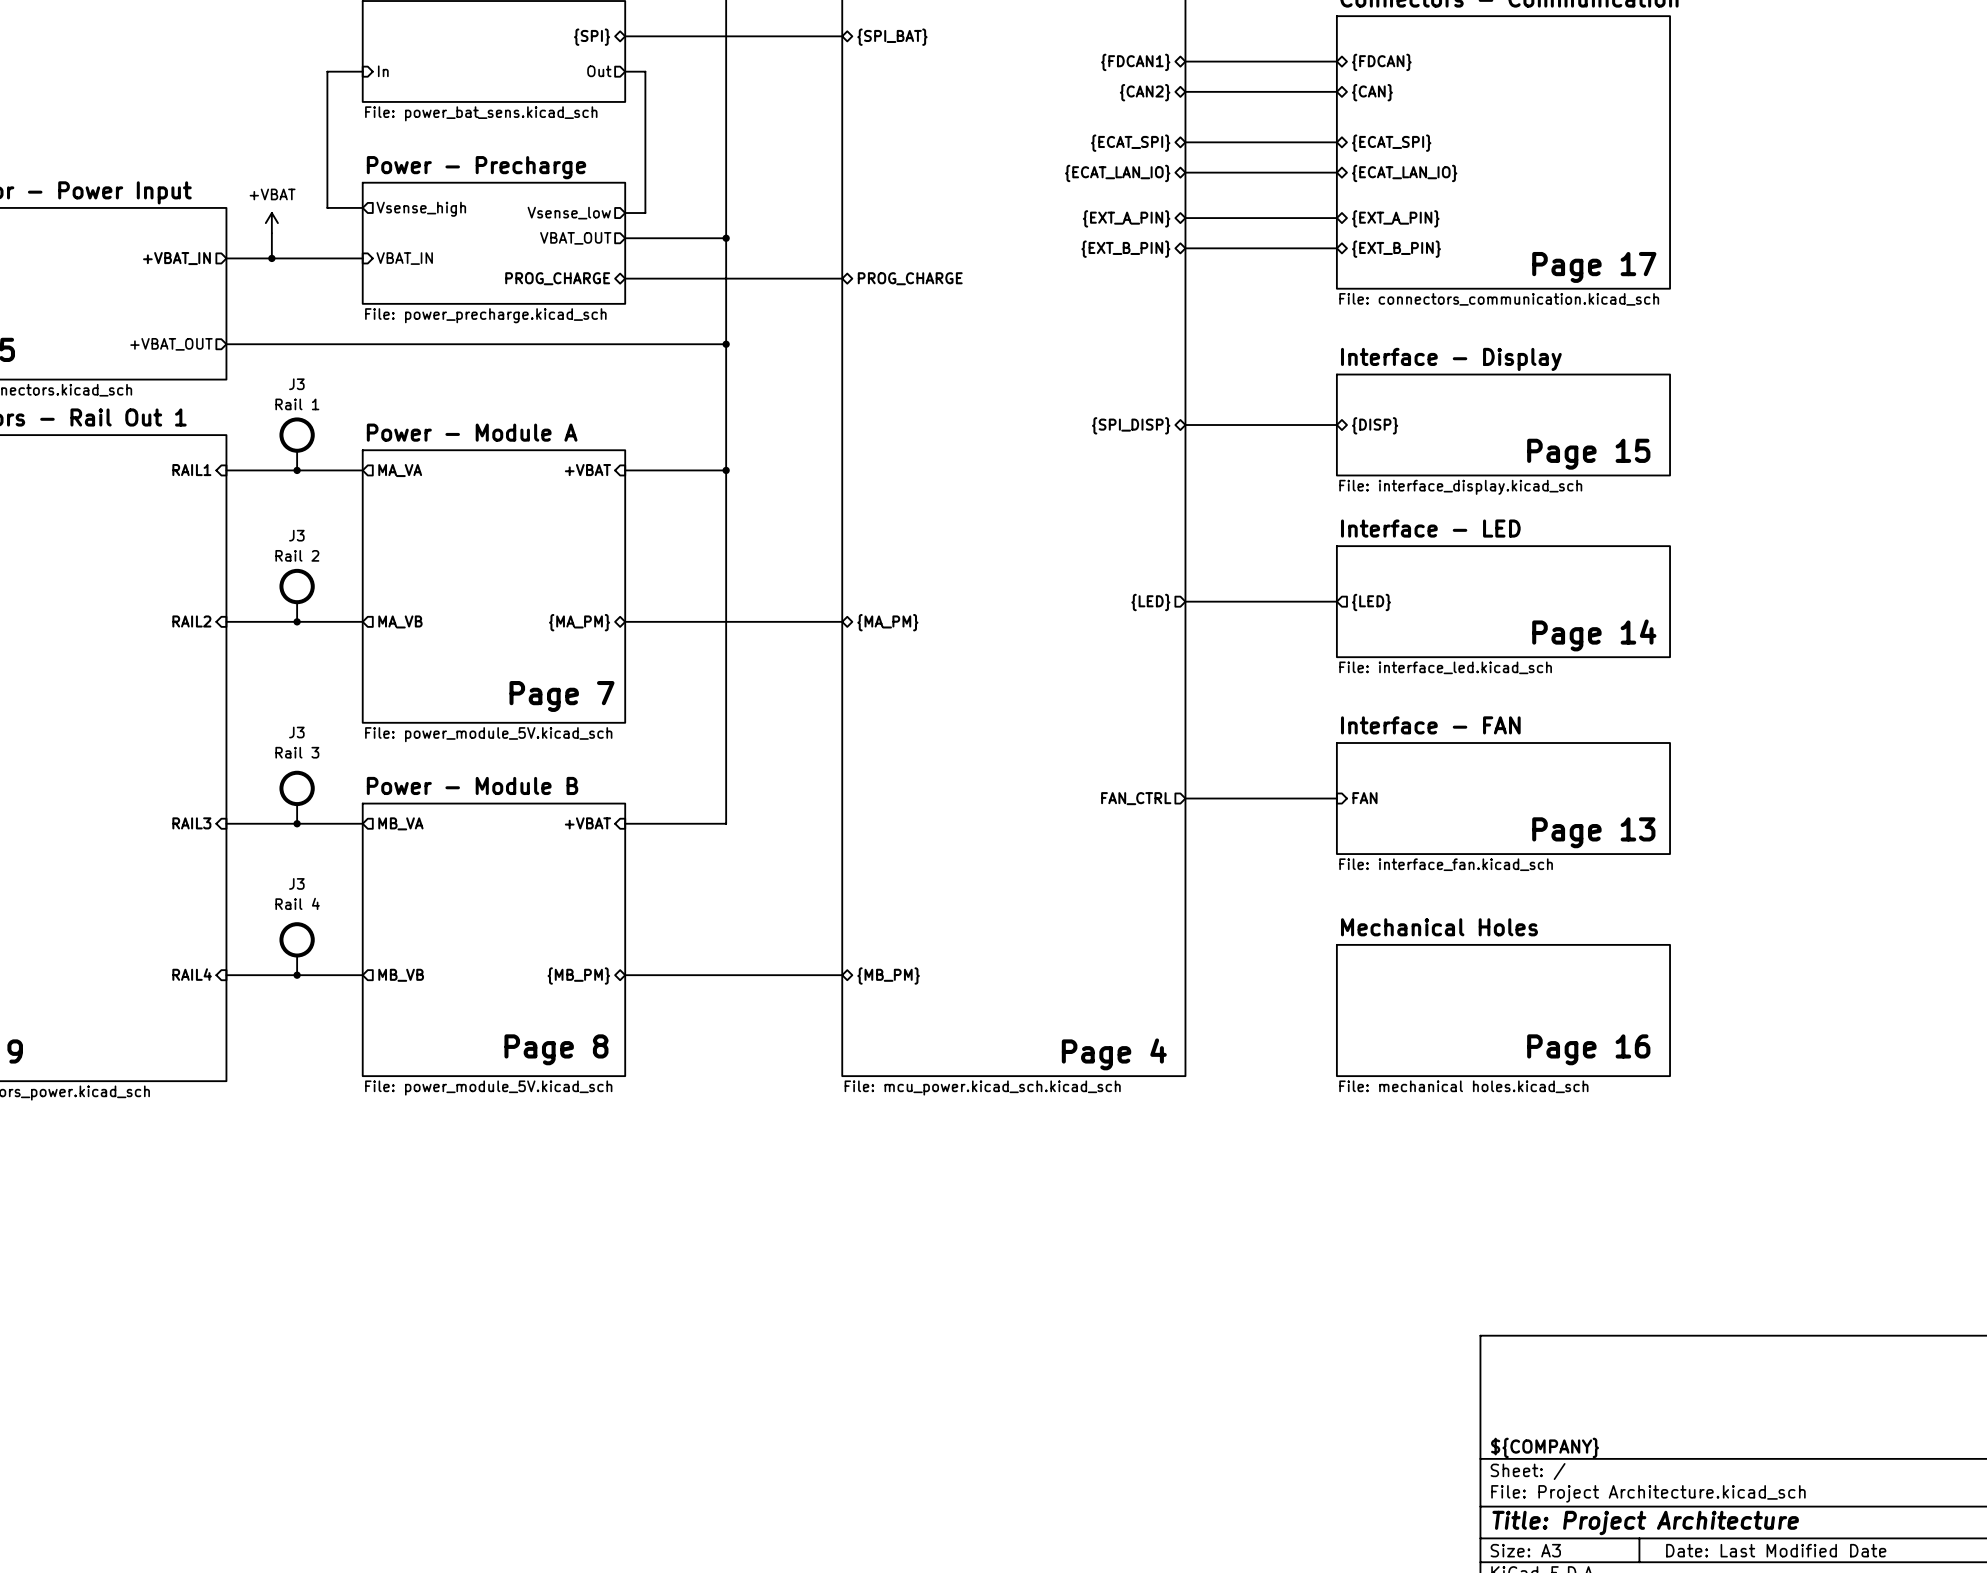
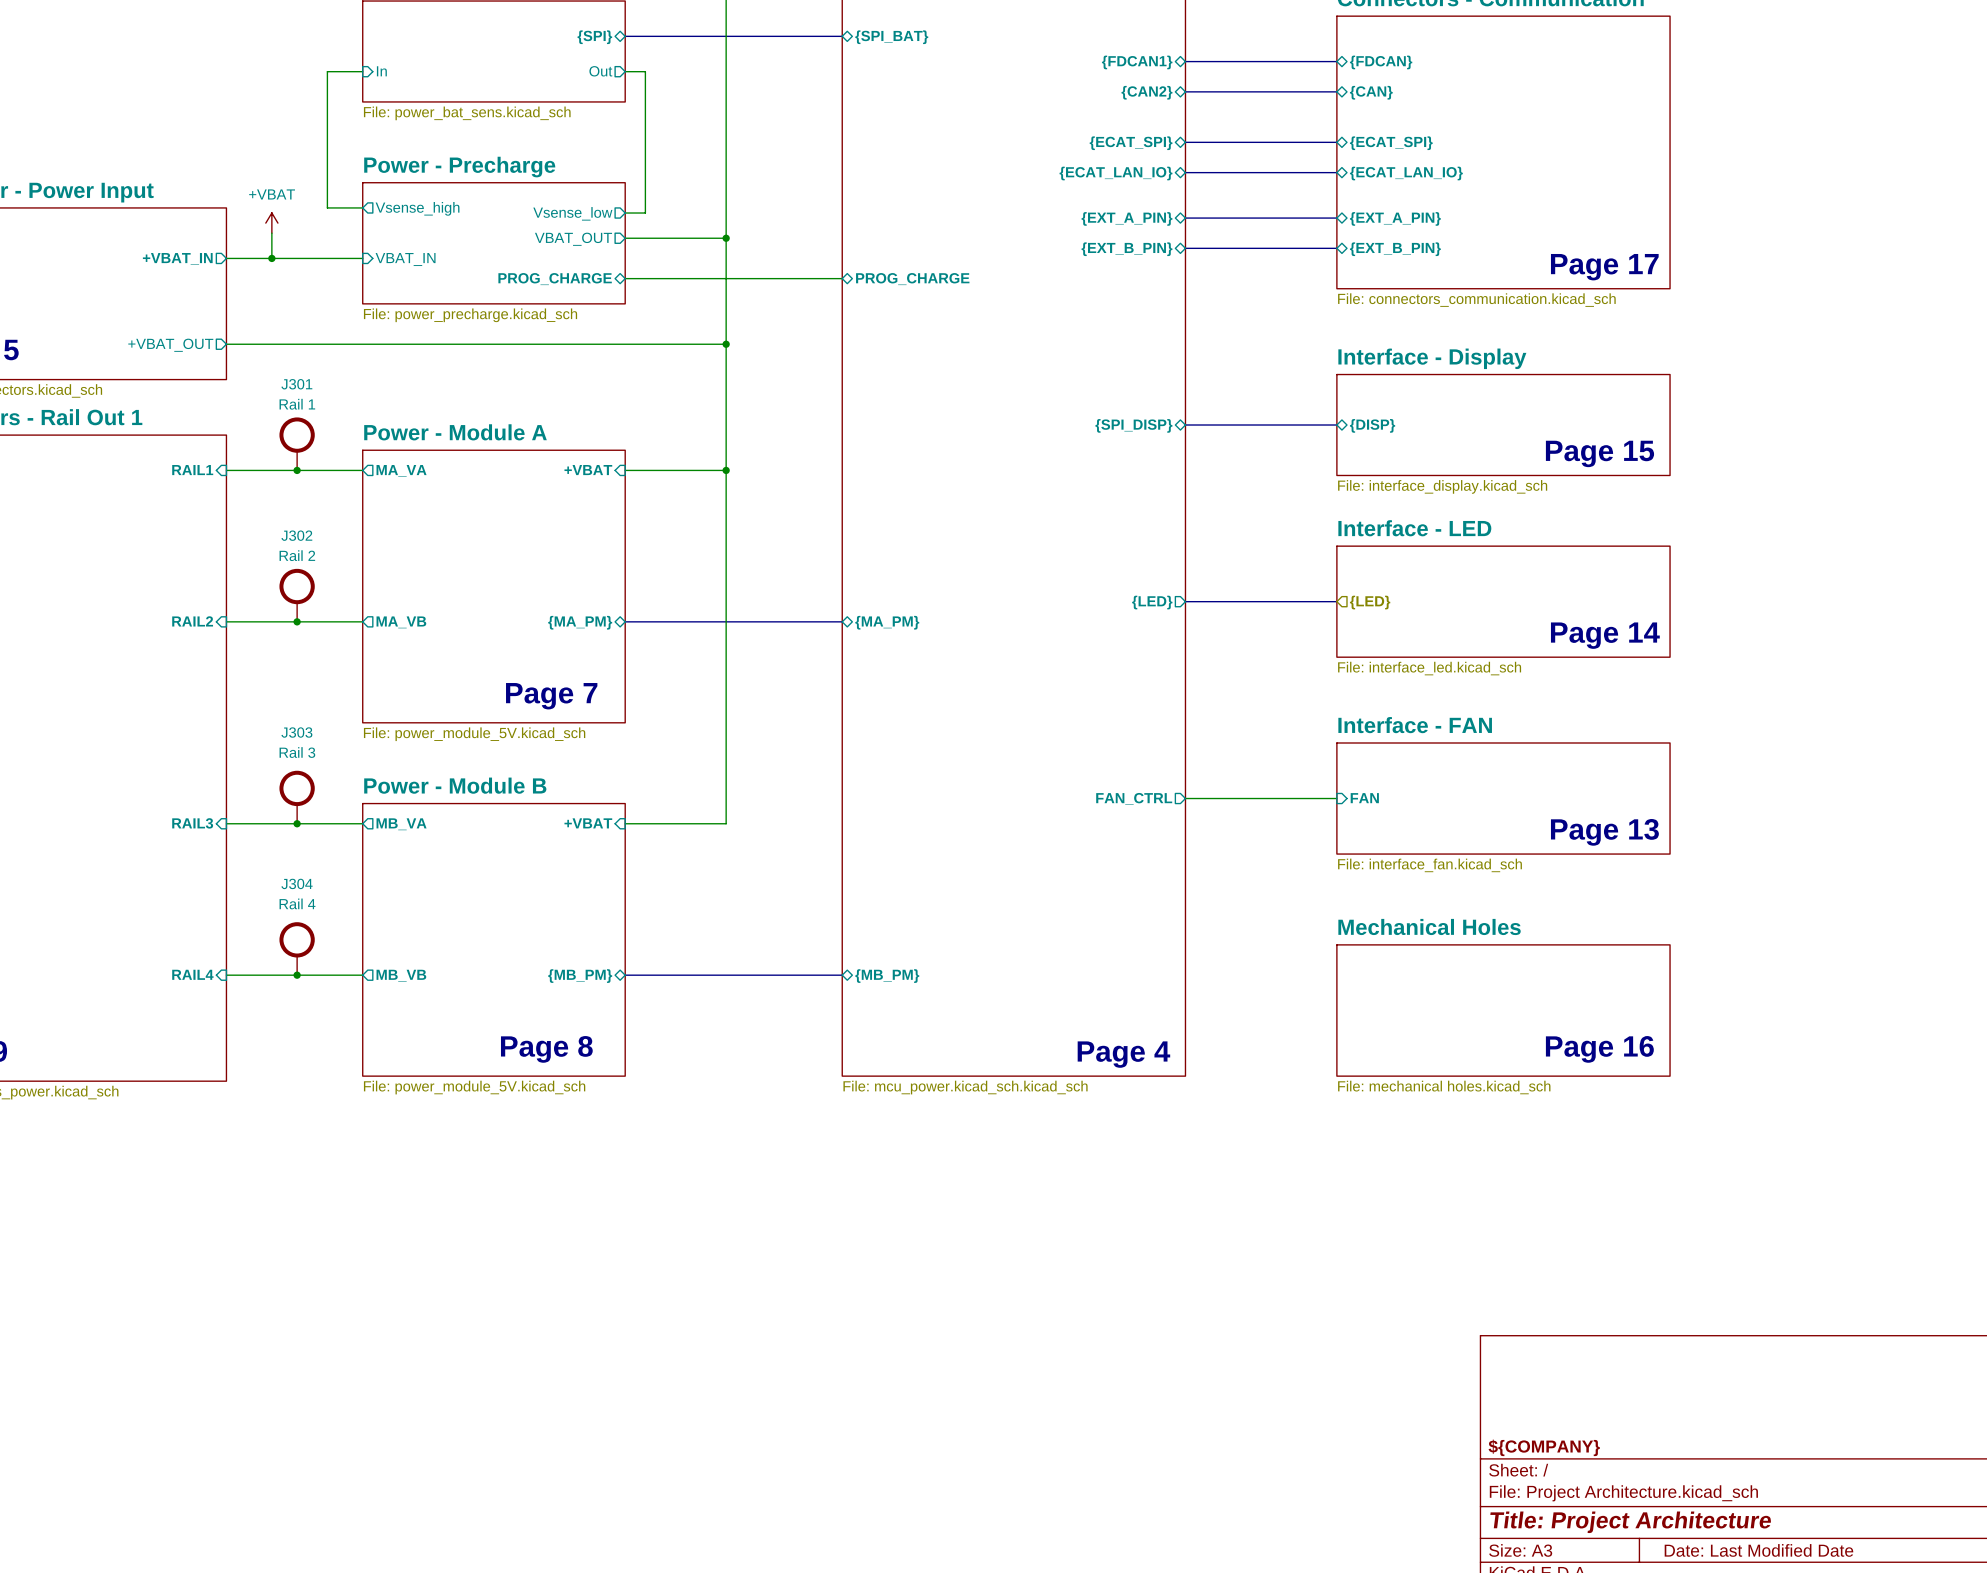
J3 name: J3 (296, 384) -> J301 (296, 384)
J3 name: J3 (296, 535) -> J302 (296, 535)
J3 name: J3 (296, 732) -> J303 (296, 732)
J3 name: J3 (296, 883) -> J304 (297, 883)

